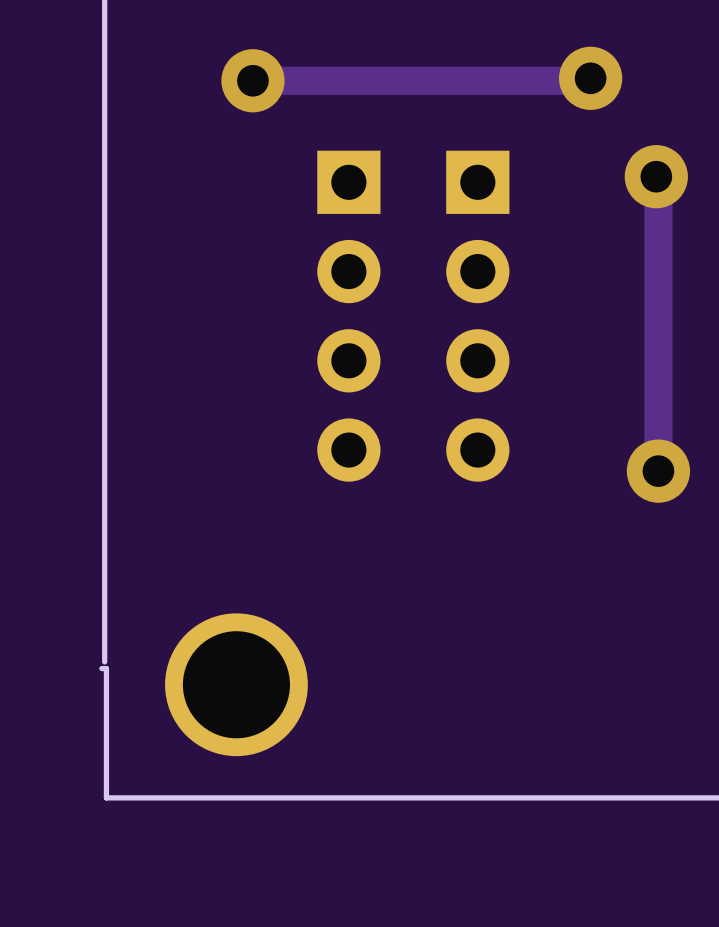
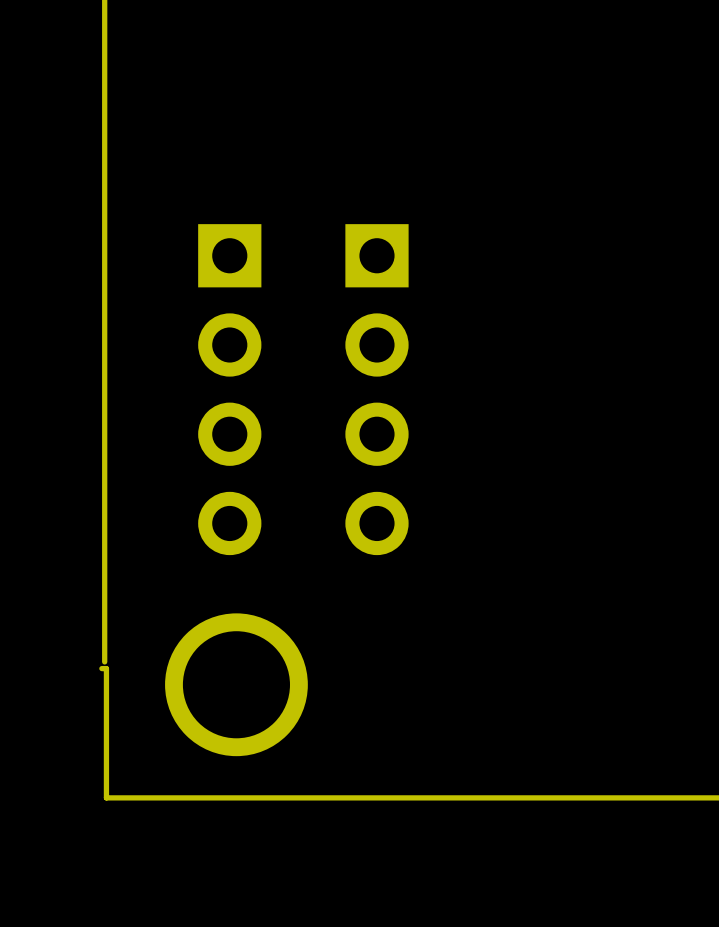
track: (590, 78) (588, 80) (252, 80) -> none
via: (590, 78) -> none
via: (252, 80) -> none
track: (656, 176) (658, 178) (658, 471) -> none
via: (656, 176) -> none
part: (348, 316) -> none
part: (477, 316) -> none
part: none -> (229, 389)
part: none -> (376, 389)
via: (658, 471) -> none

